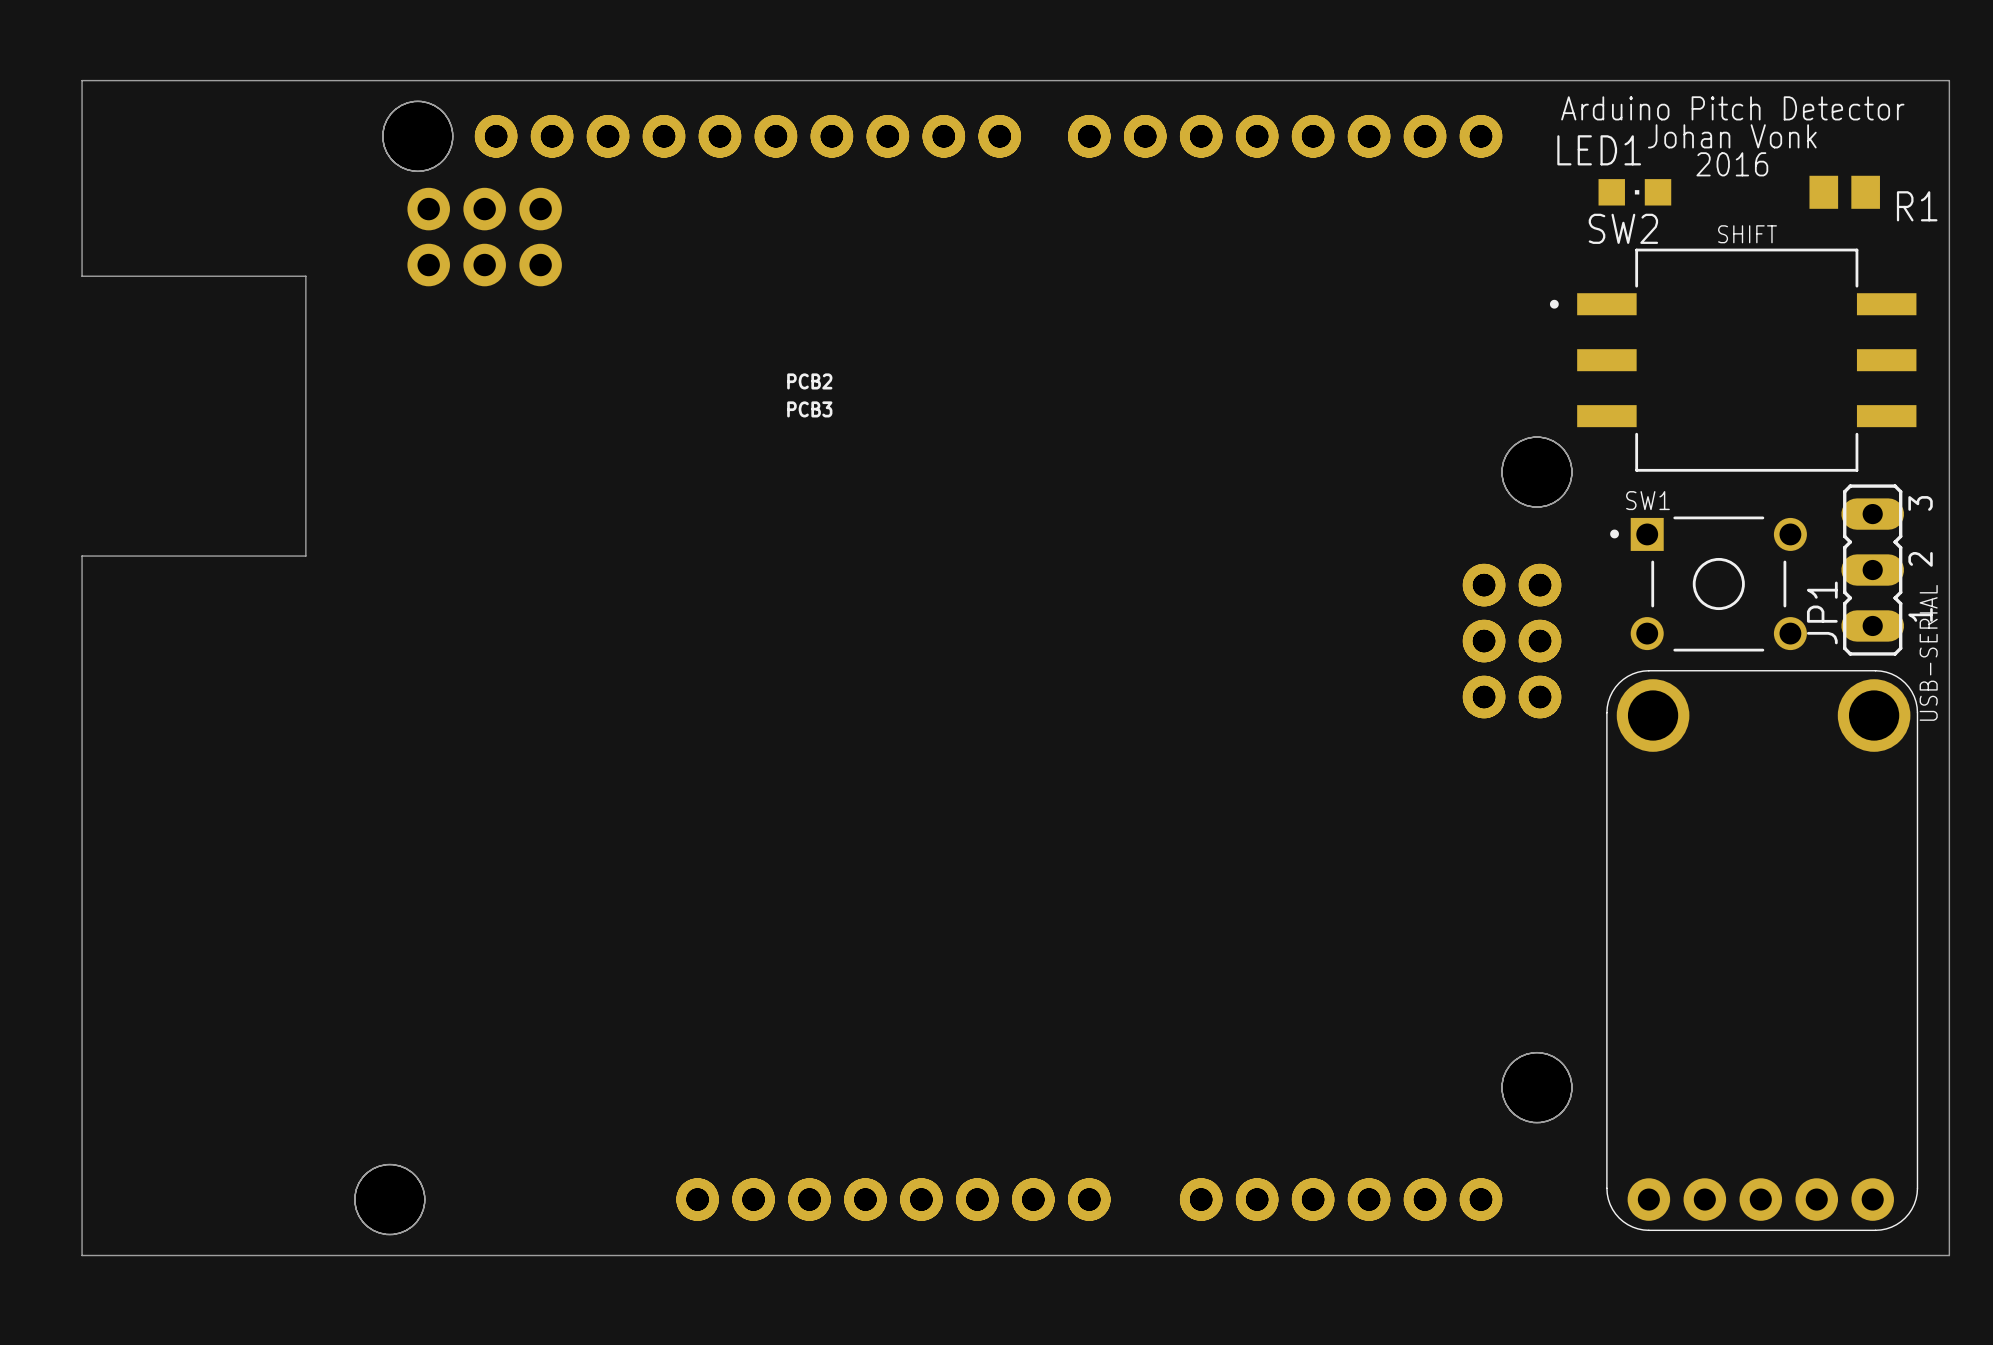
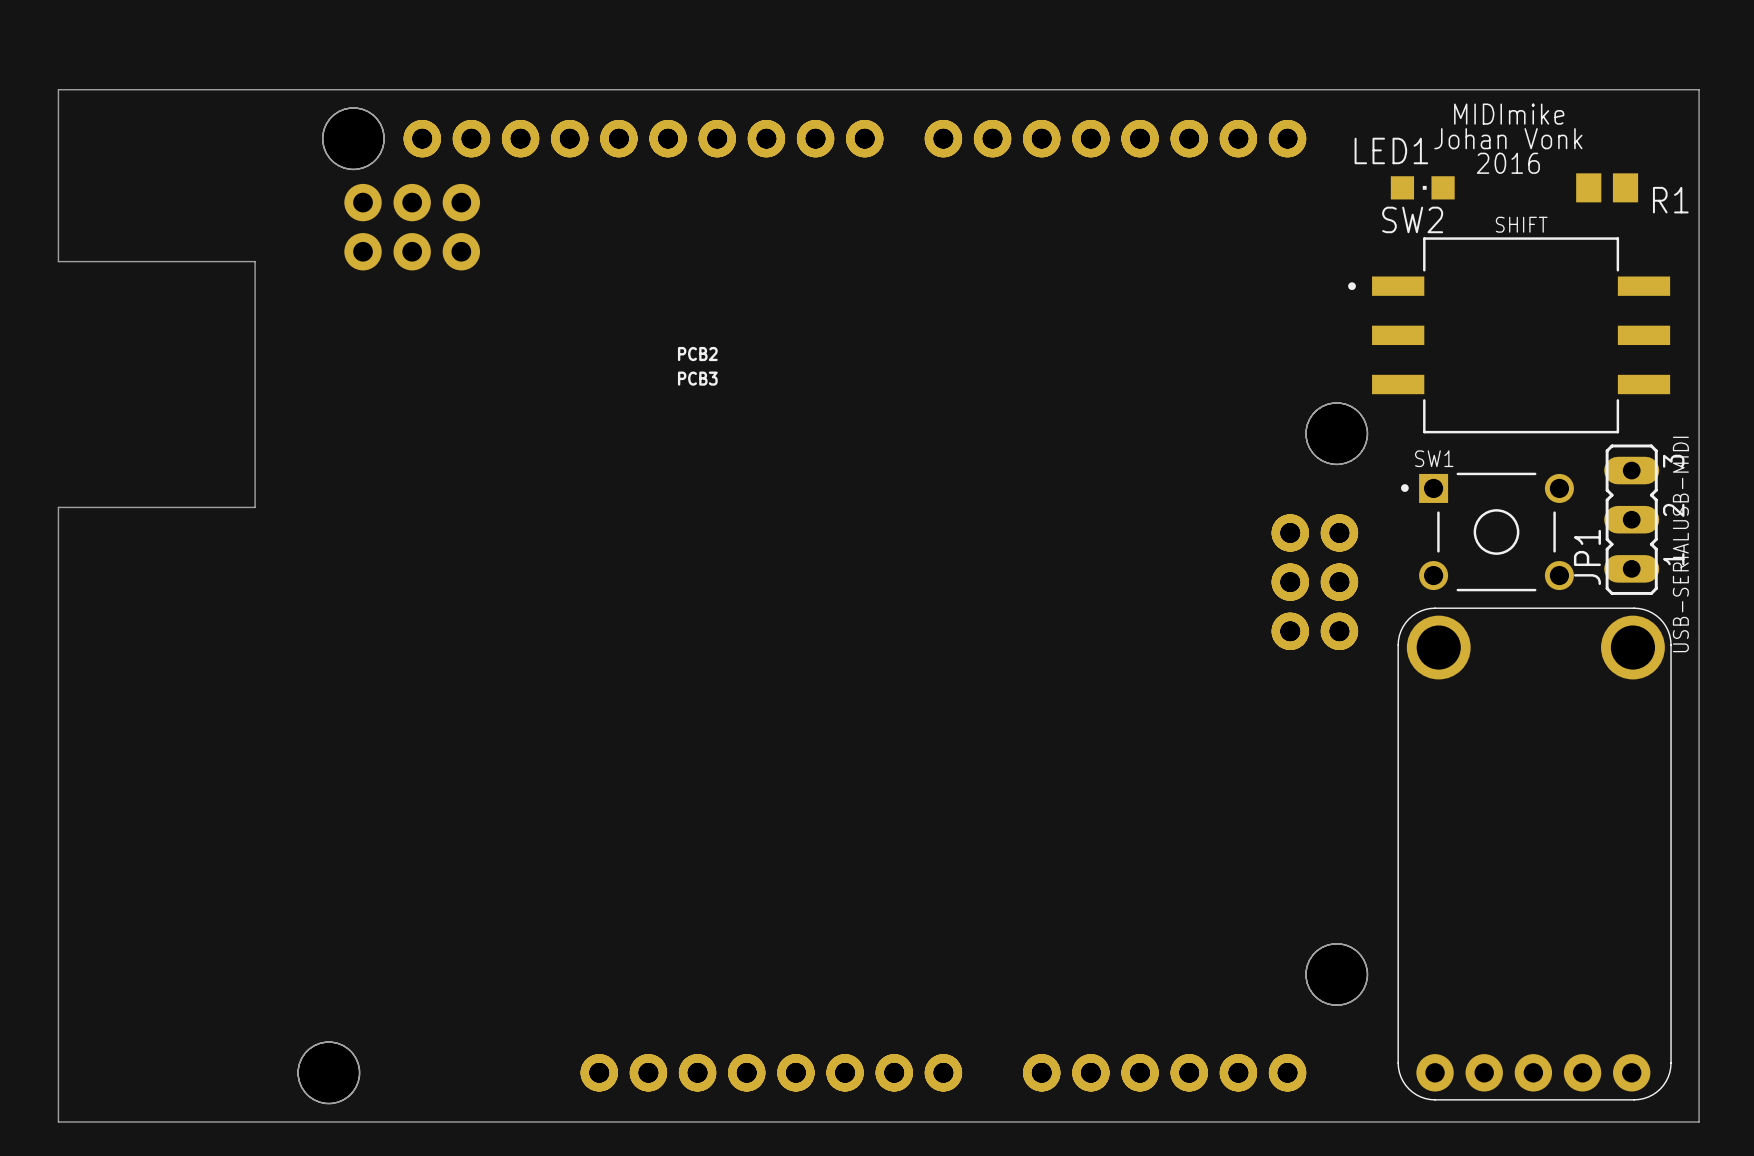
text: Arduino Pitch Detector (1732, 108) -> MIDImike (1509, 114)
text: none -> USB-MIDI (1680, 482)

